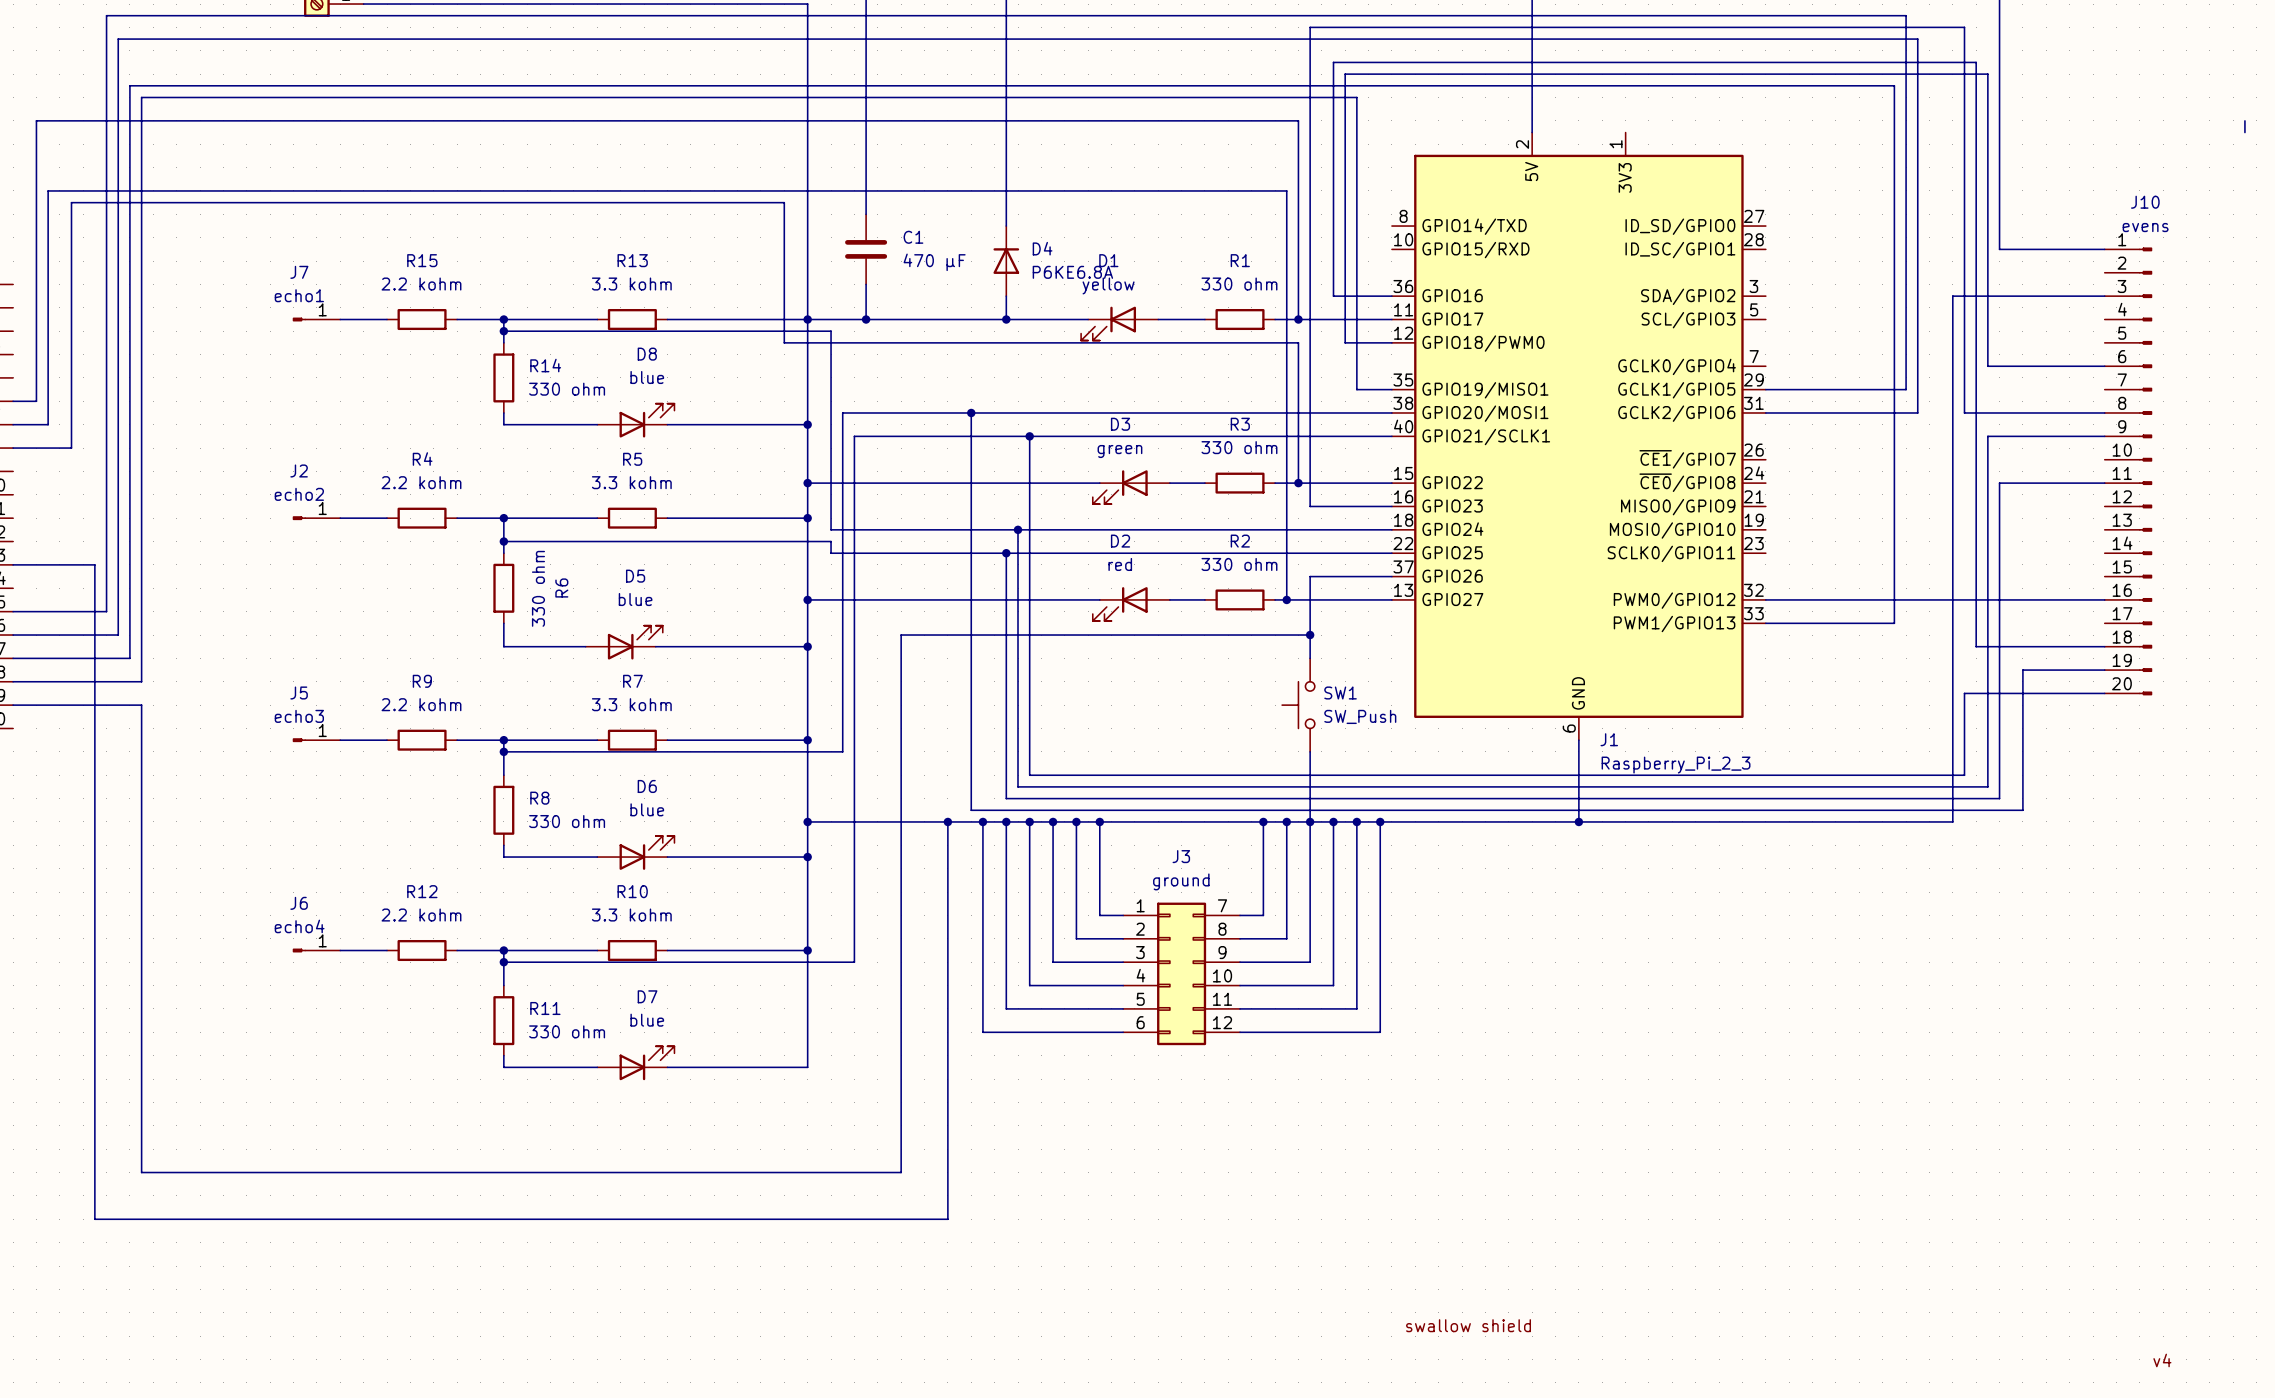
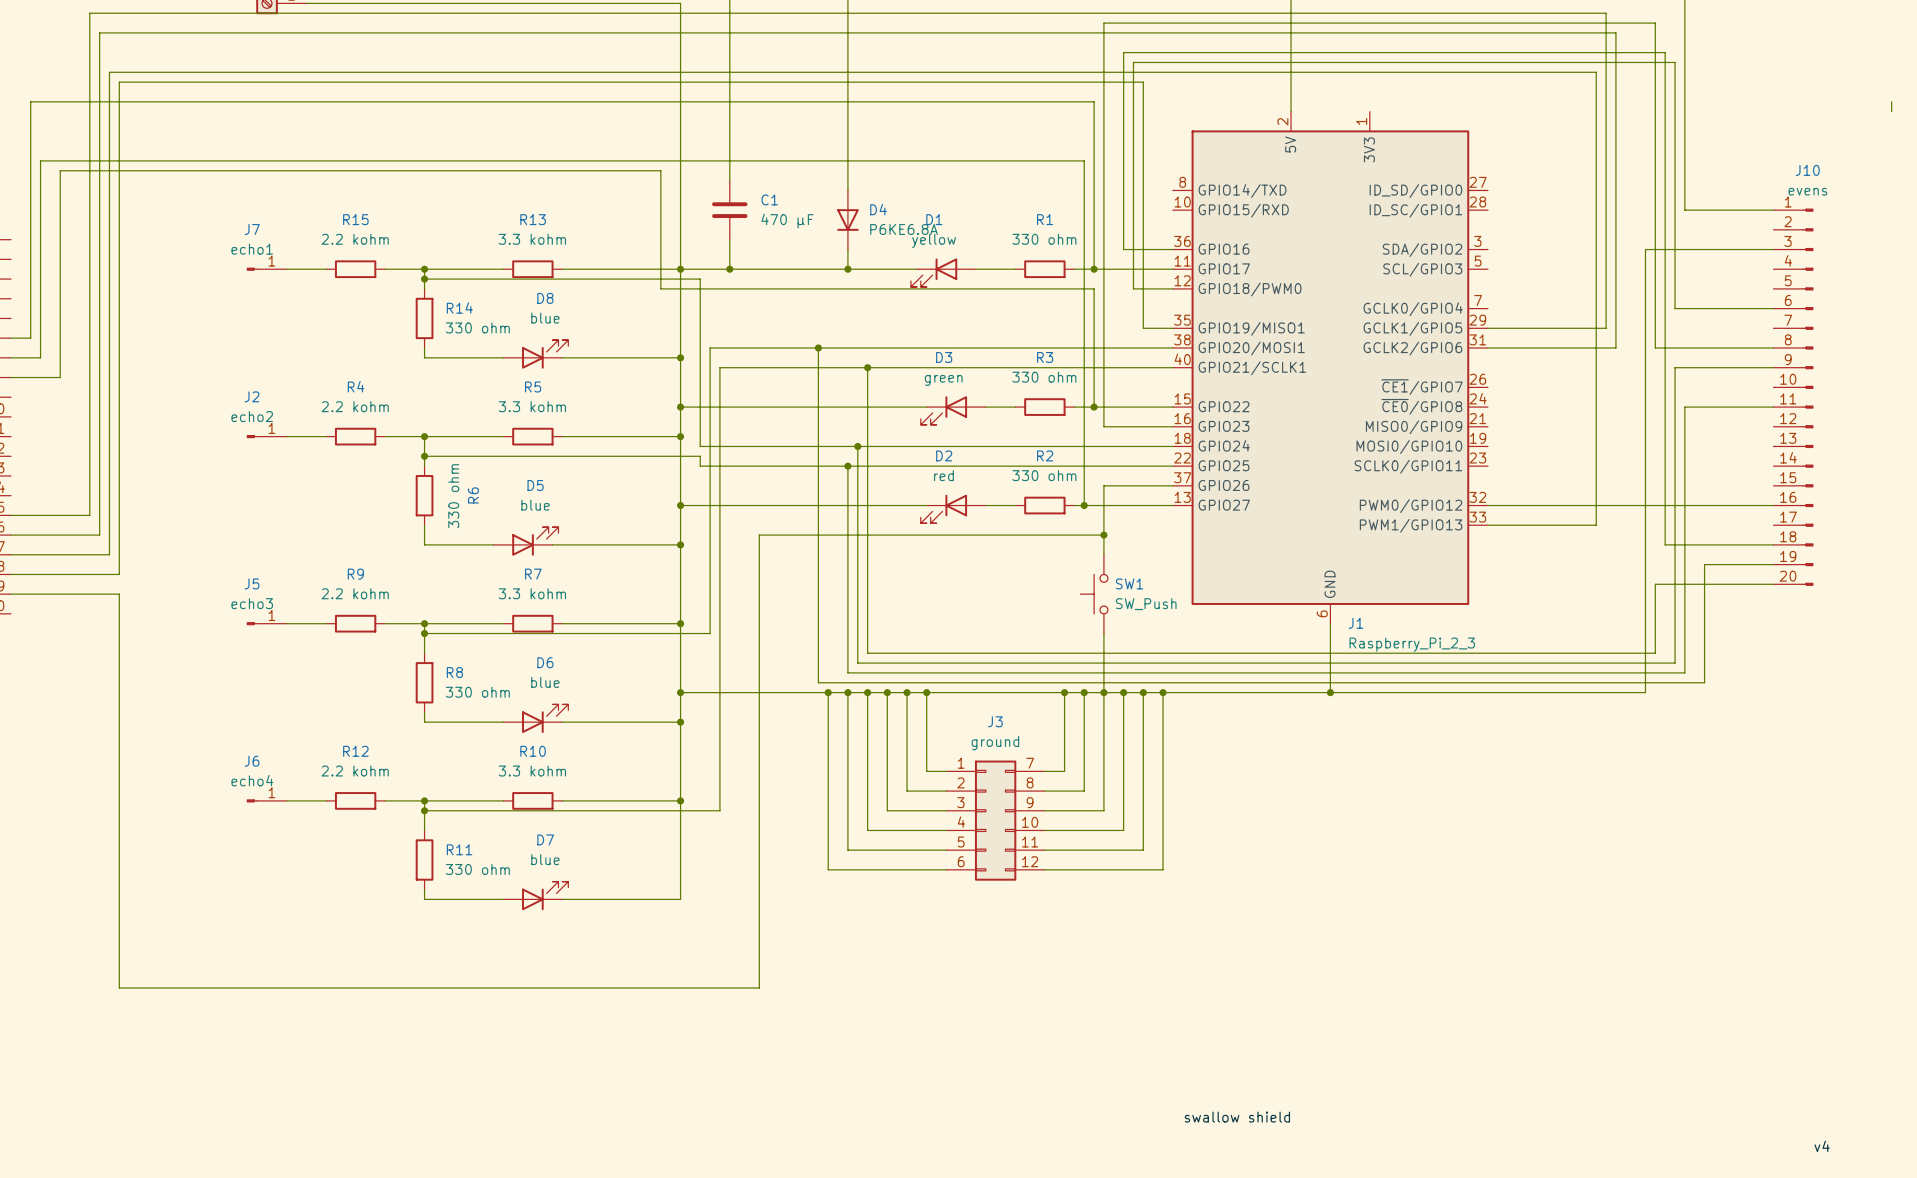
D4 rotation: 0° (1006, 261) -> 180° (847, 219)
wire: (13, 564) (94, 564) (94, 1219) (947, 1219) (947, 821) -> none
junction: (947, 821) -> none

